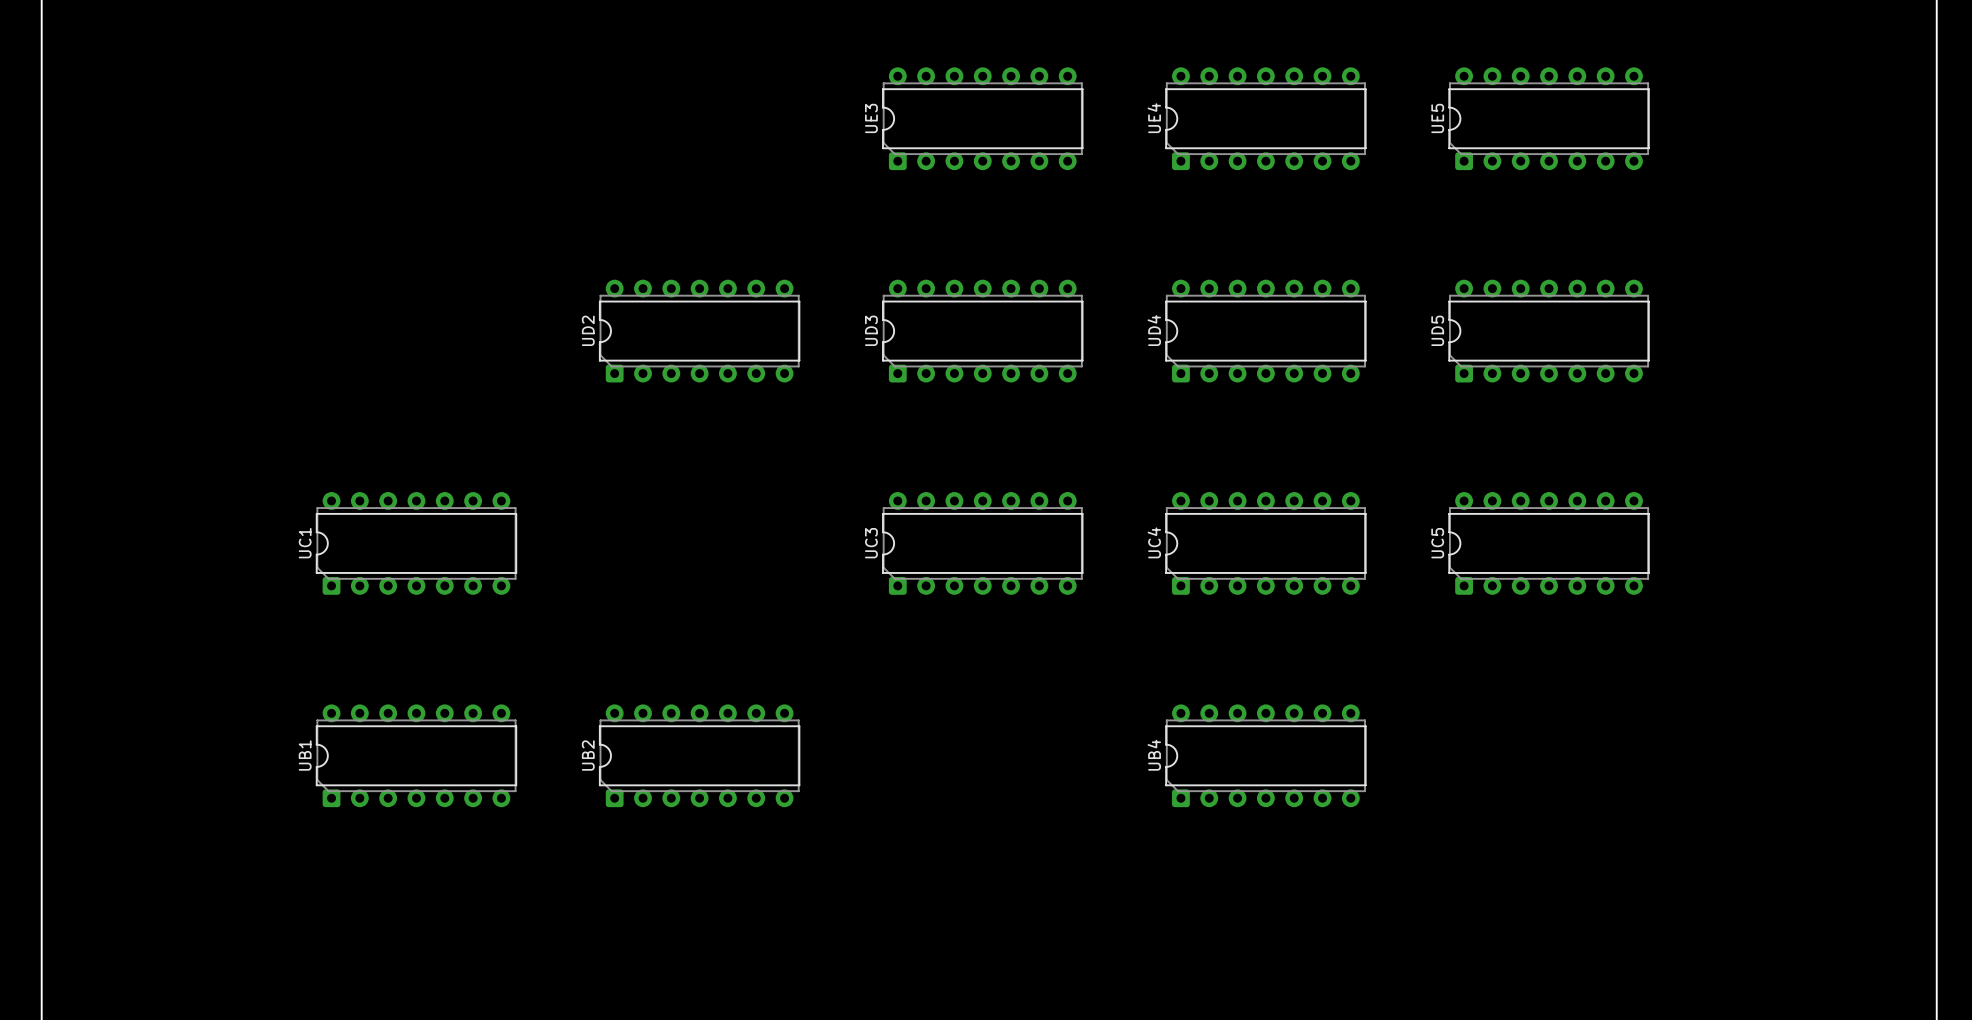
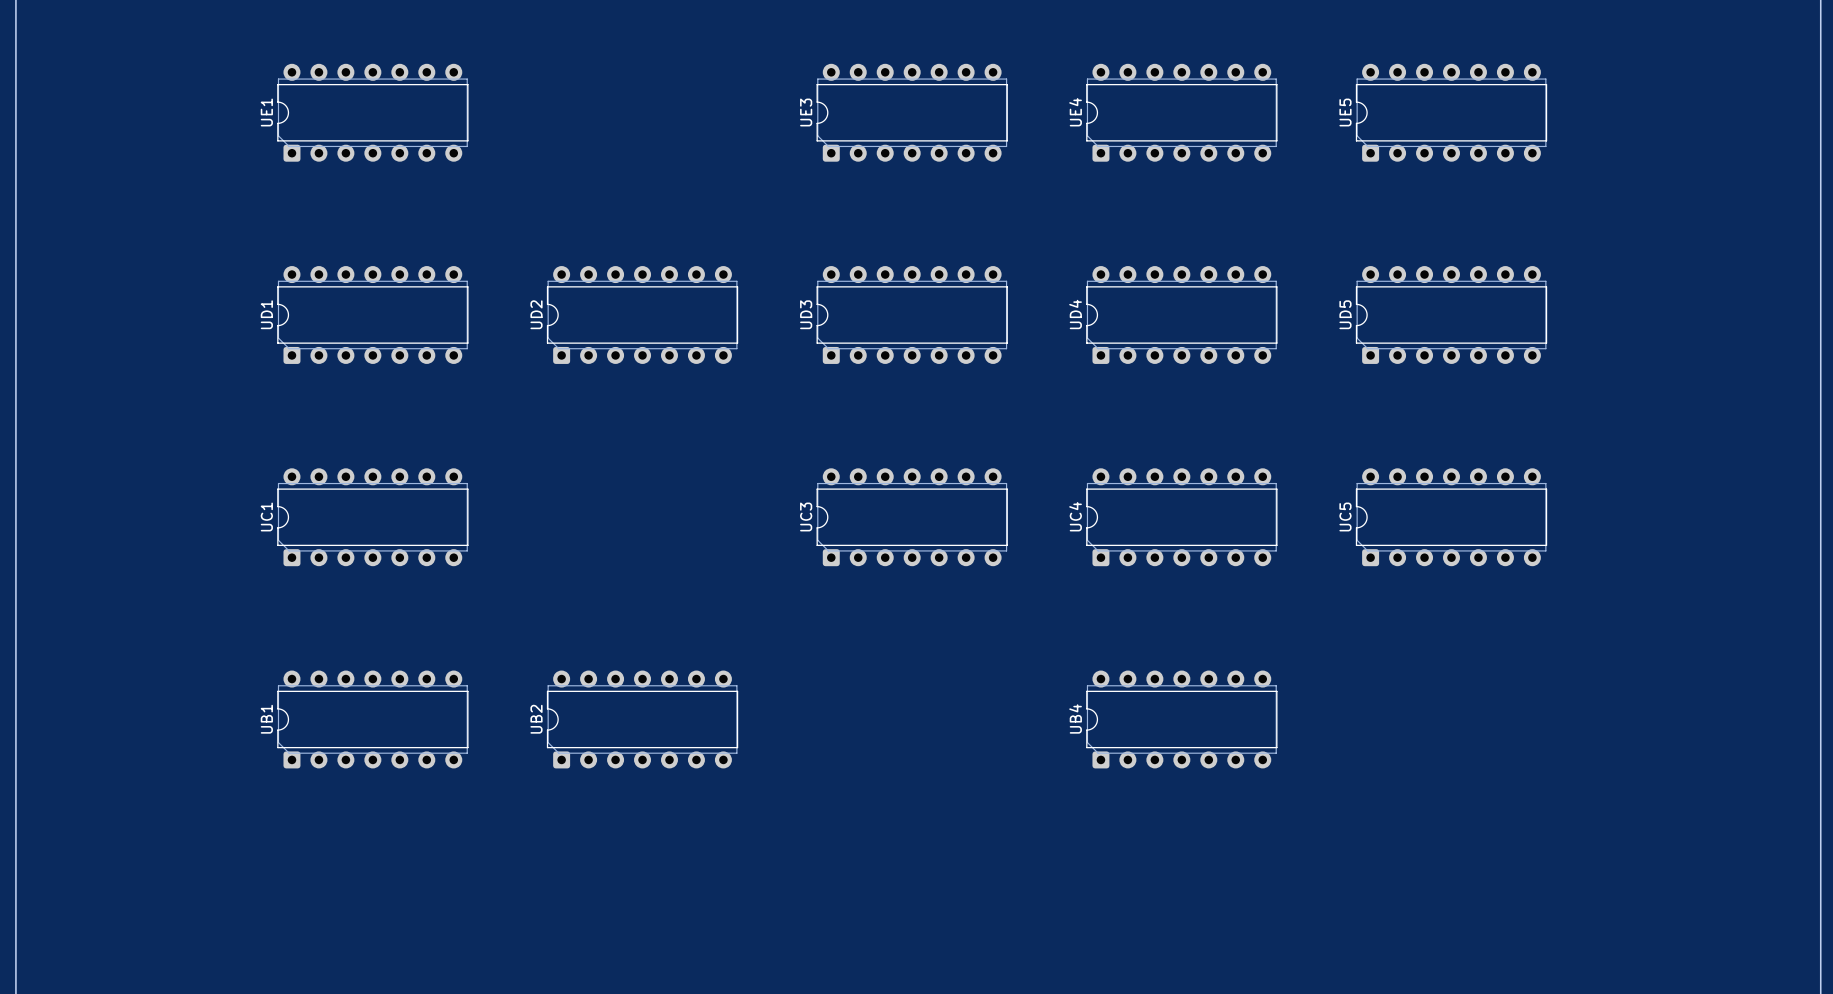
UE1: none -> (372, 112)
UD1: none -> (372, 315)

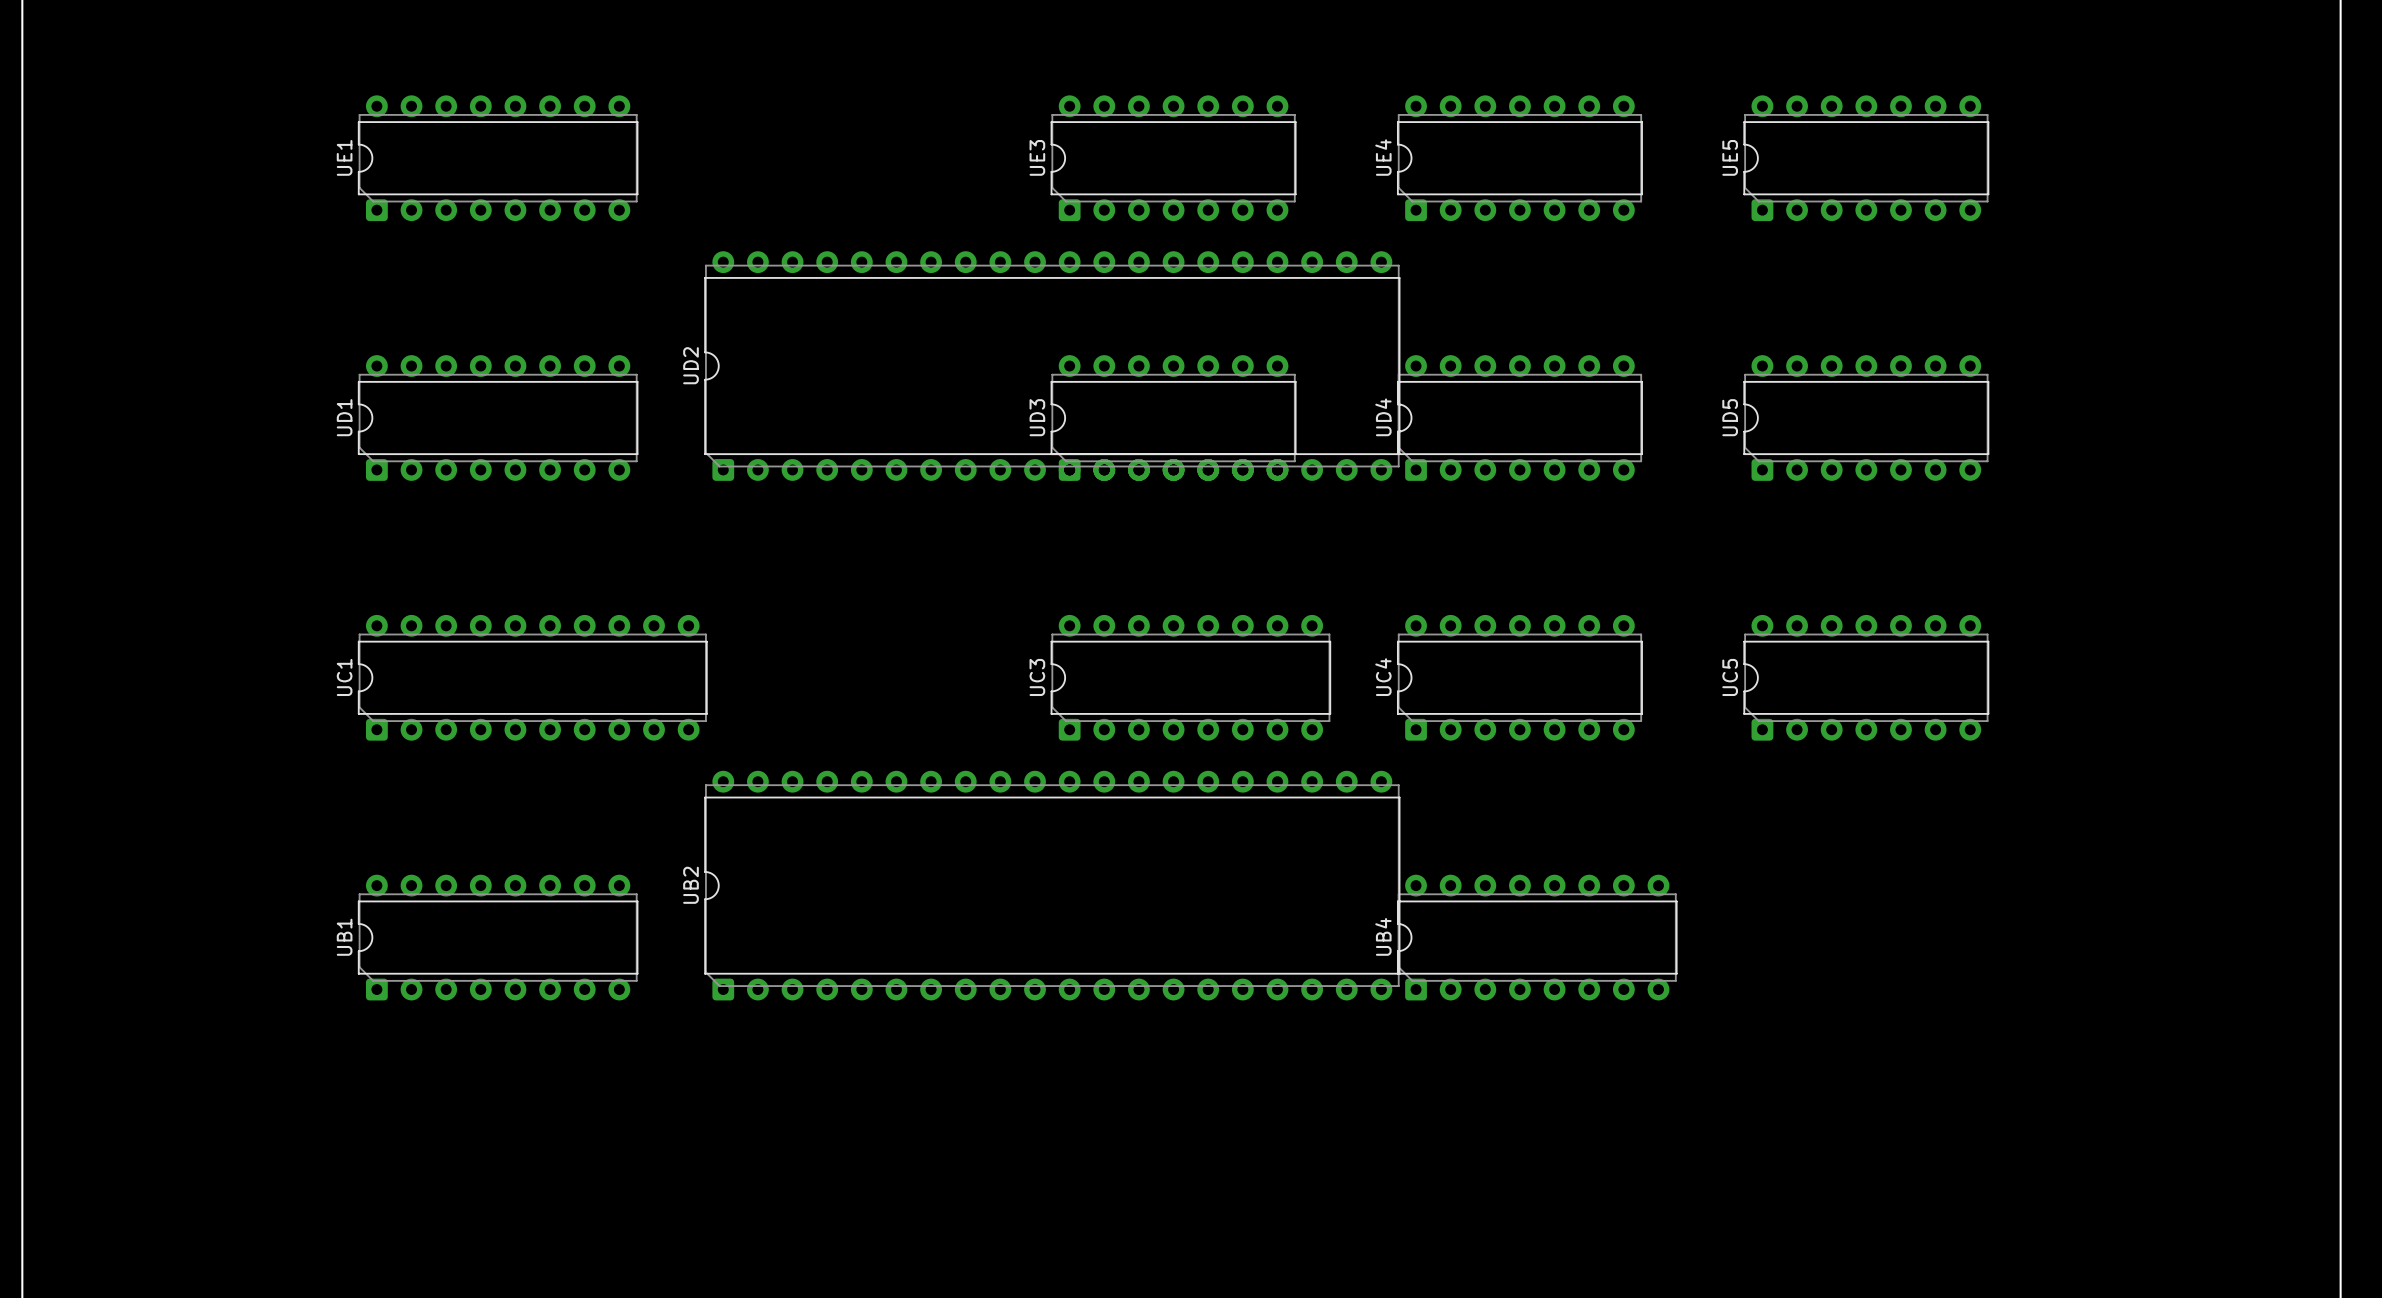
UE1 footprint: [277, 63, 469, 162] -> [357, 95, 639, 222]
UD1 footprint: [277, 266, 469, 364] -> [357, 355, 639, 481]
UD2 footprint: [546, 266, 739, 364] -> [704, 251, 1401, 481]
UD2 name position: UD2 (536, 314) -> UD2 (690, 365)
UC1 footprint: [277, 468, 469, 567] -> [357, 614, 708, 741]
UC3 footprint: [816, 468, 1008, 567] -> [1050, 614, 1332, 741]
UB1 footprint: [277, 670, 469, 769] -> [357, 874, 639, 1001]
UB2 footprint: [546, 670, 739, 769] -> [704, 770, 1401, 1001]
UB4 footprint: [1086, 670, 1278, 769] -> [1397, 874, 1678, 1001]
UB2 name position: UB2 (536, 719) -> UB2 (690, 885)

